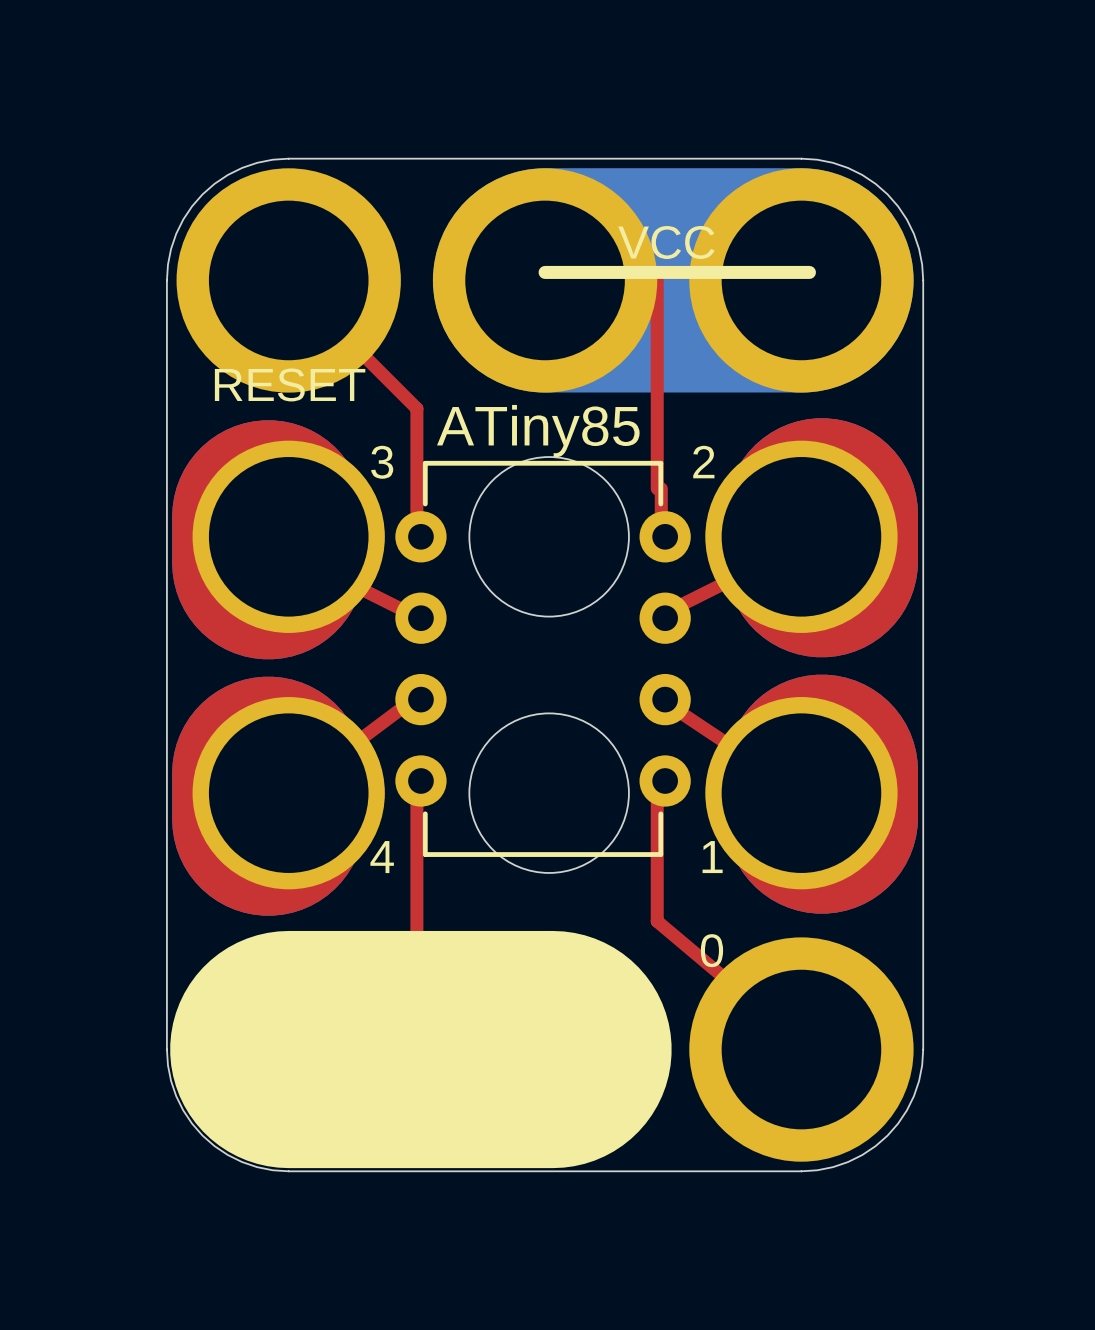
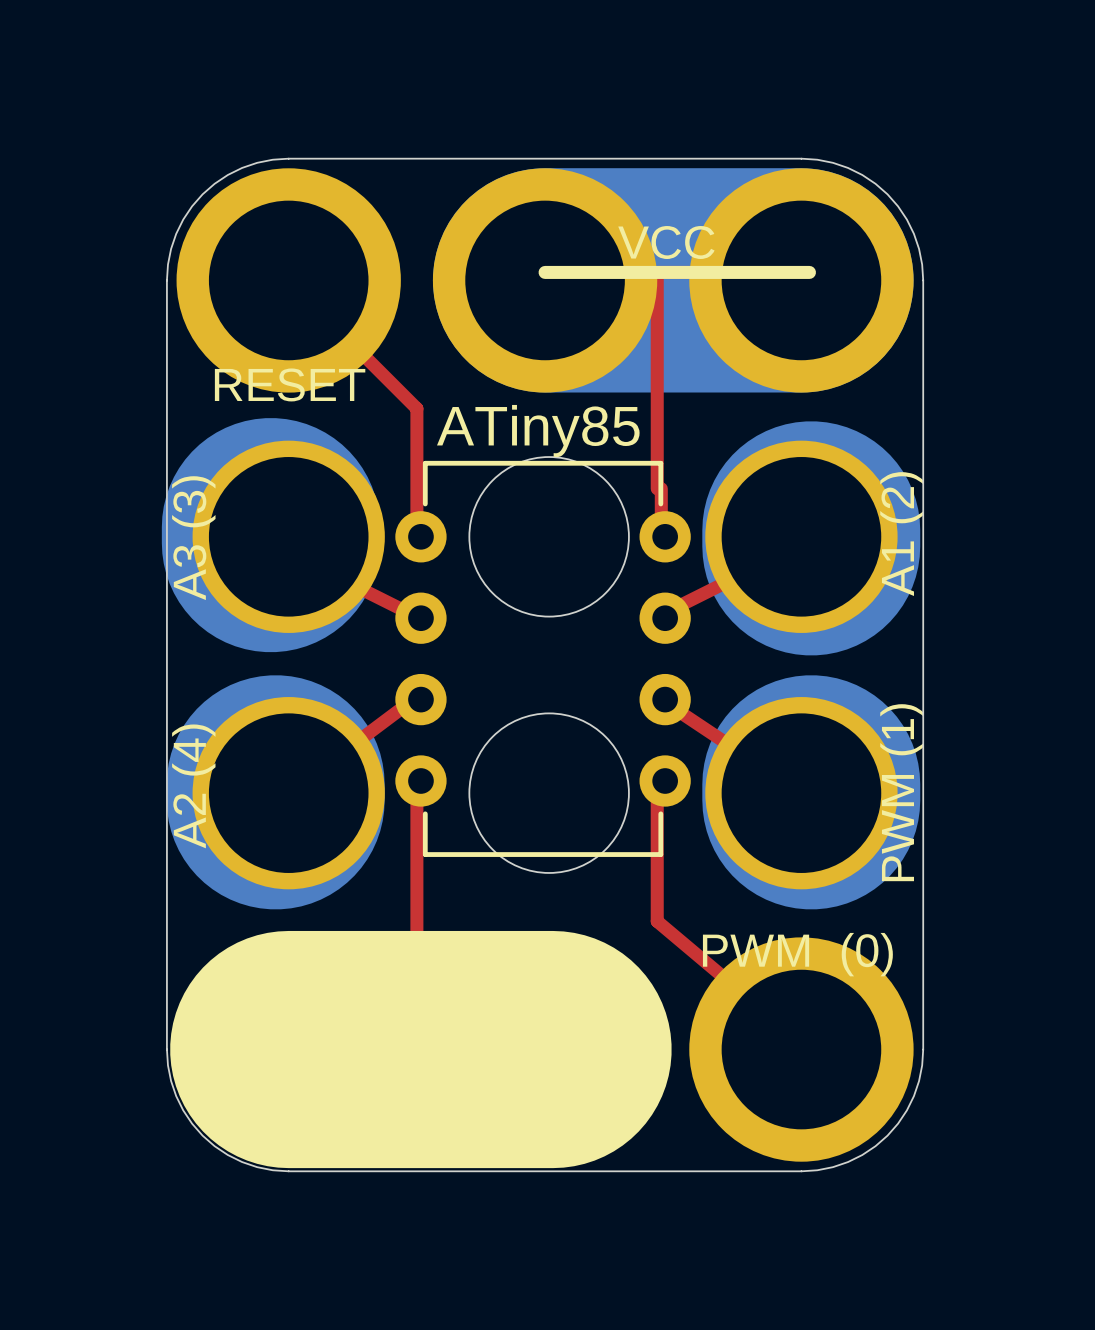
part footprint: [166, 157, 925, 1173] -> [161, 157, 925, 1173]

